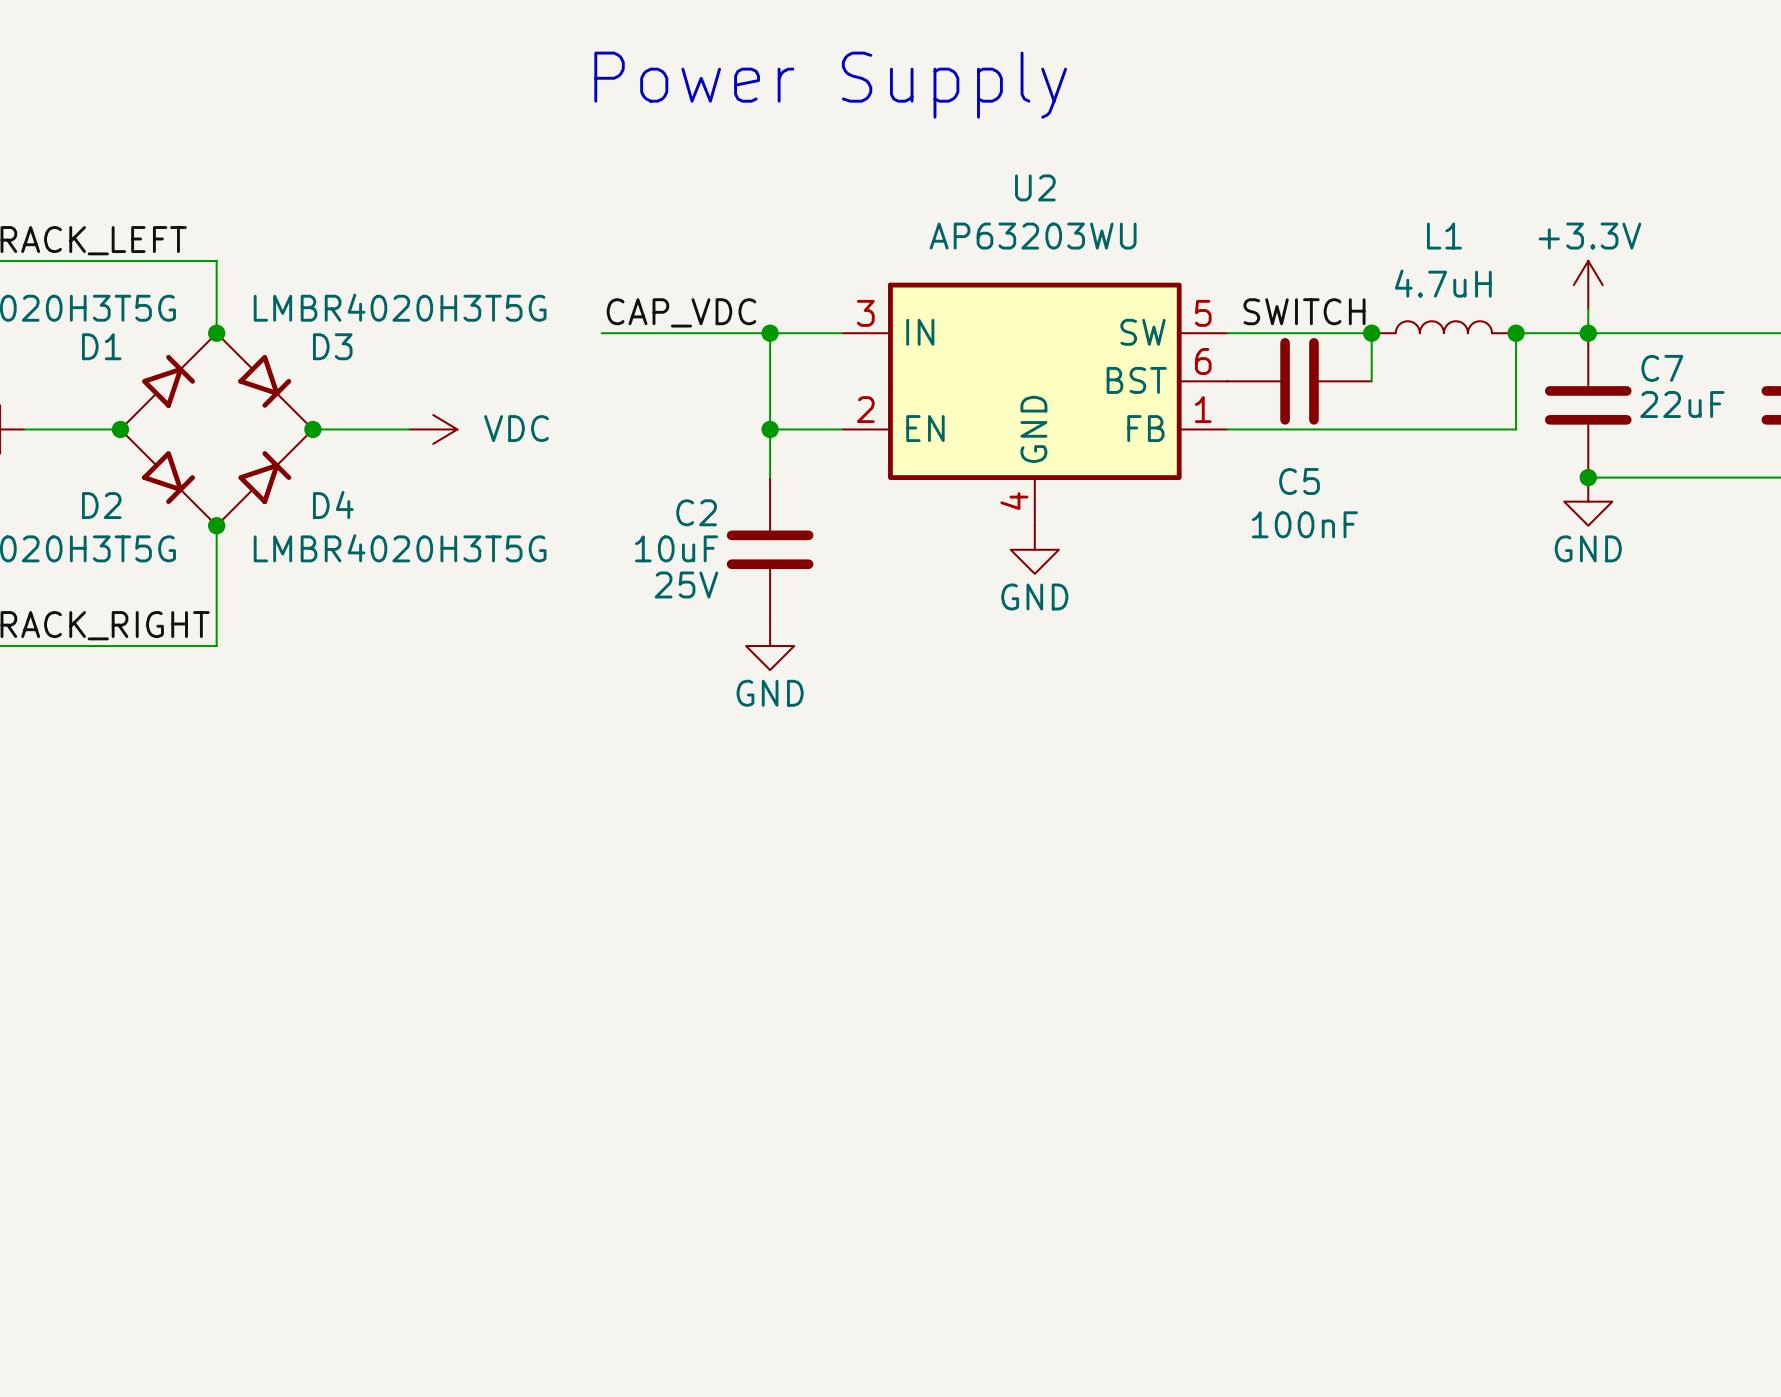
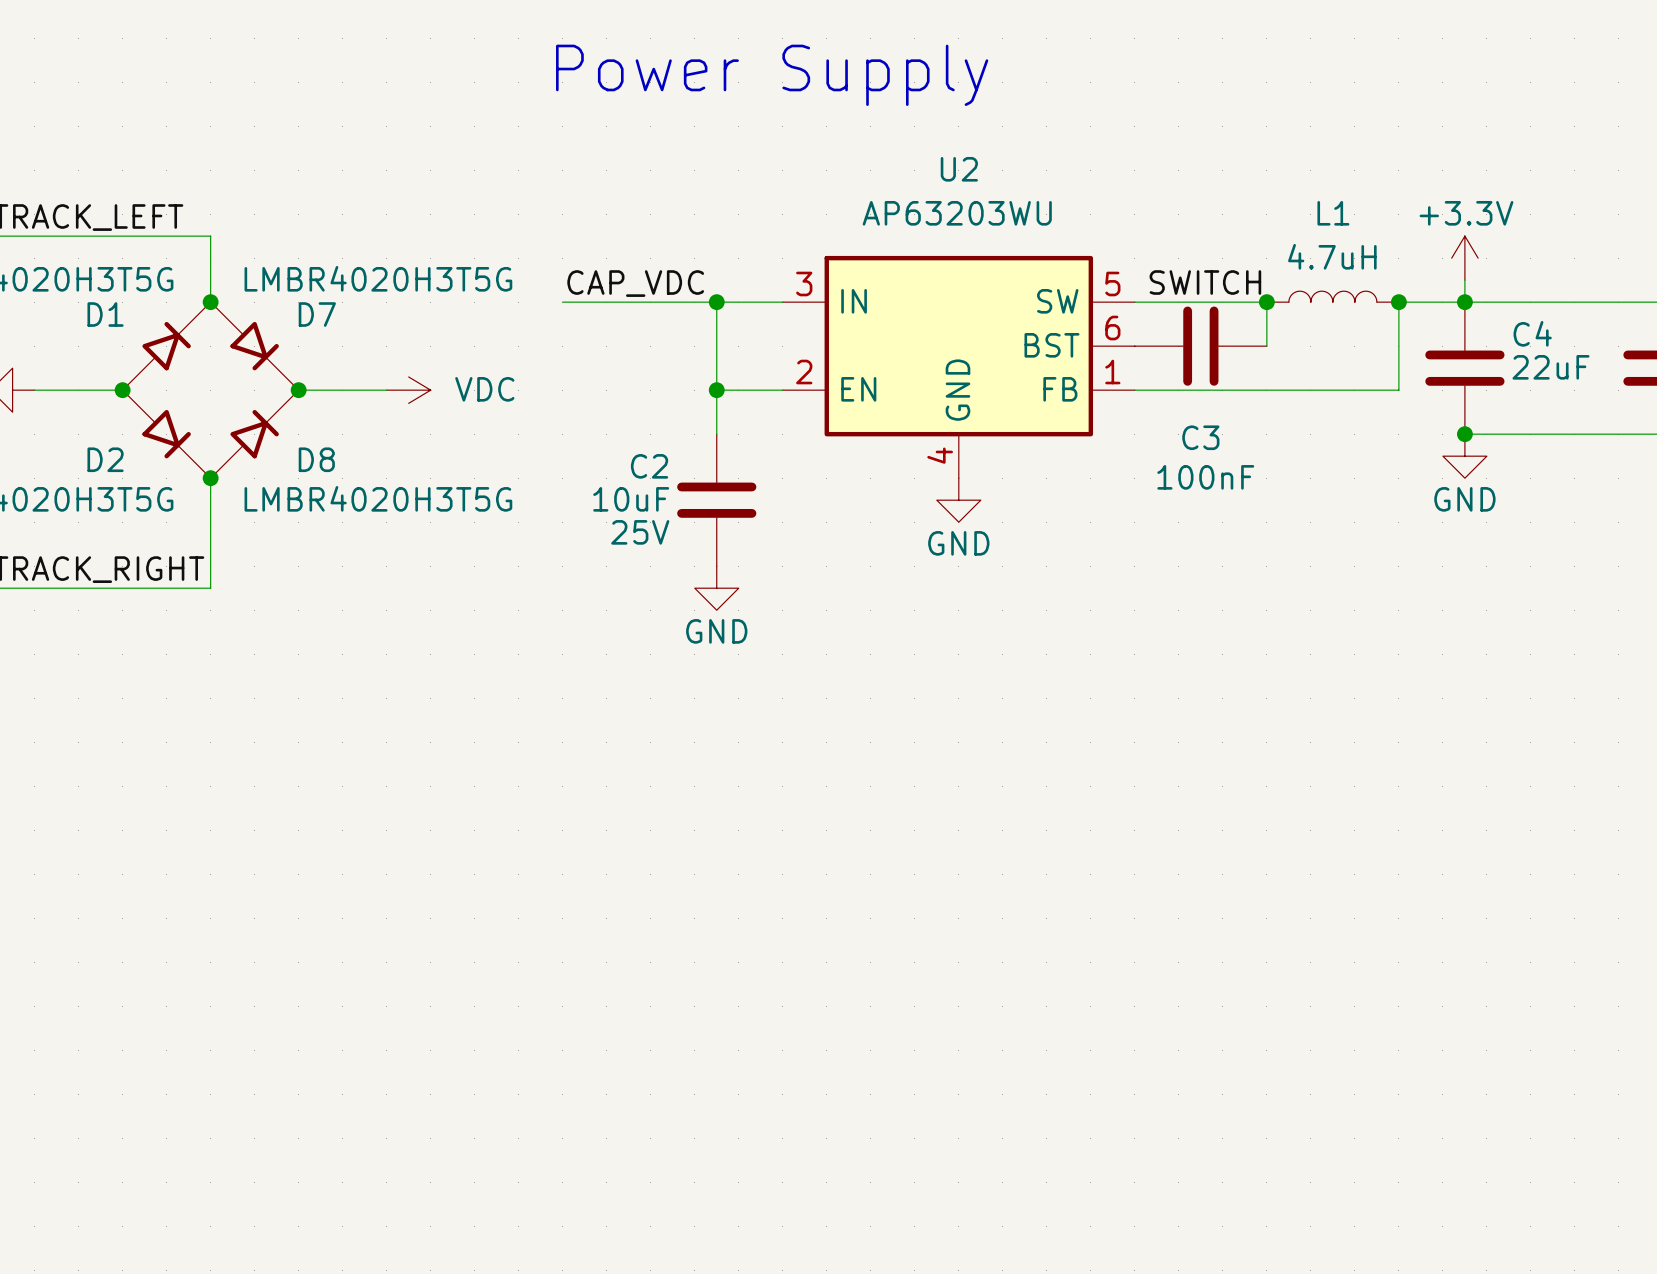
D3 name: D3 (332, 346) -> D7 (317, 314)
C7 name: C7 (1662, 368) -> C4 (1532, 333)
C5 name: C5 (1299, 481) -> C3 (1200, 437)
D4 name: D4 (333, 504) -> D8 (316, 459)

